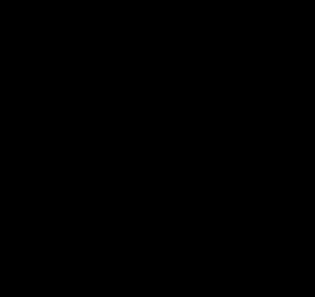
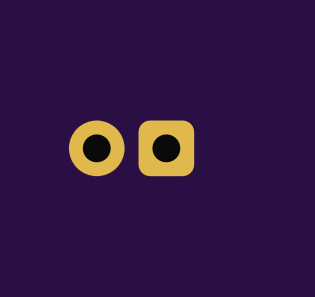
part: none -> (131, 148)

